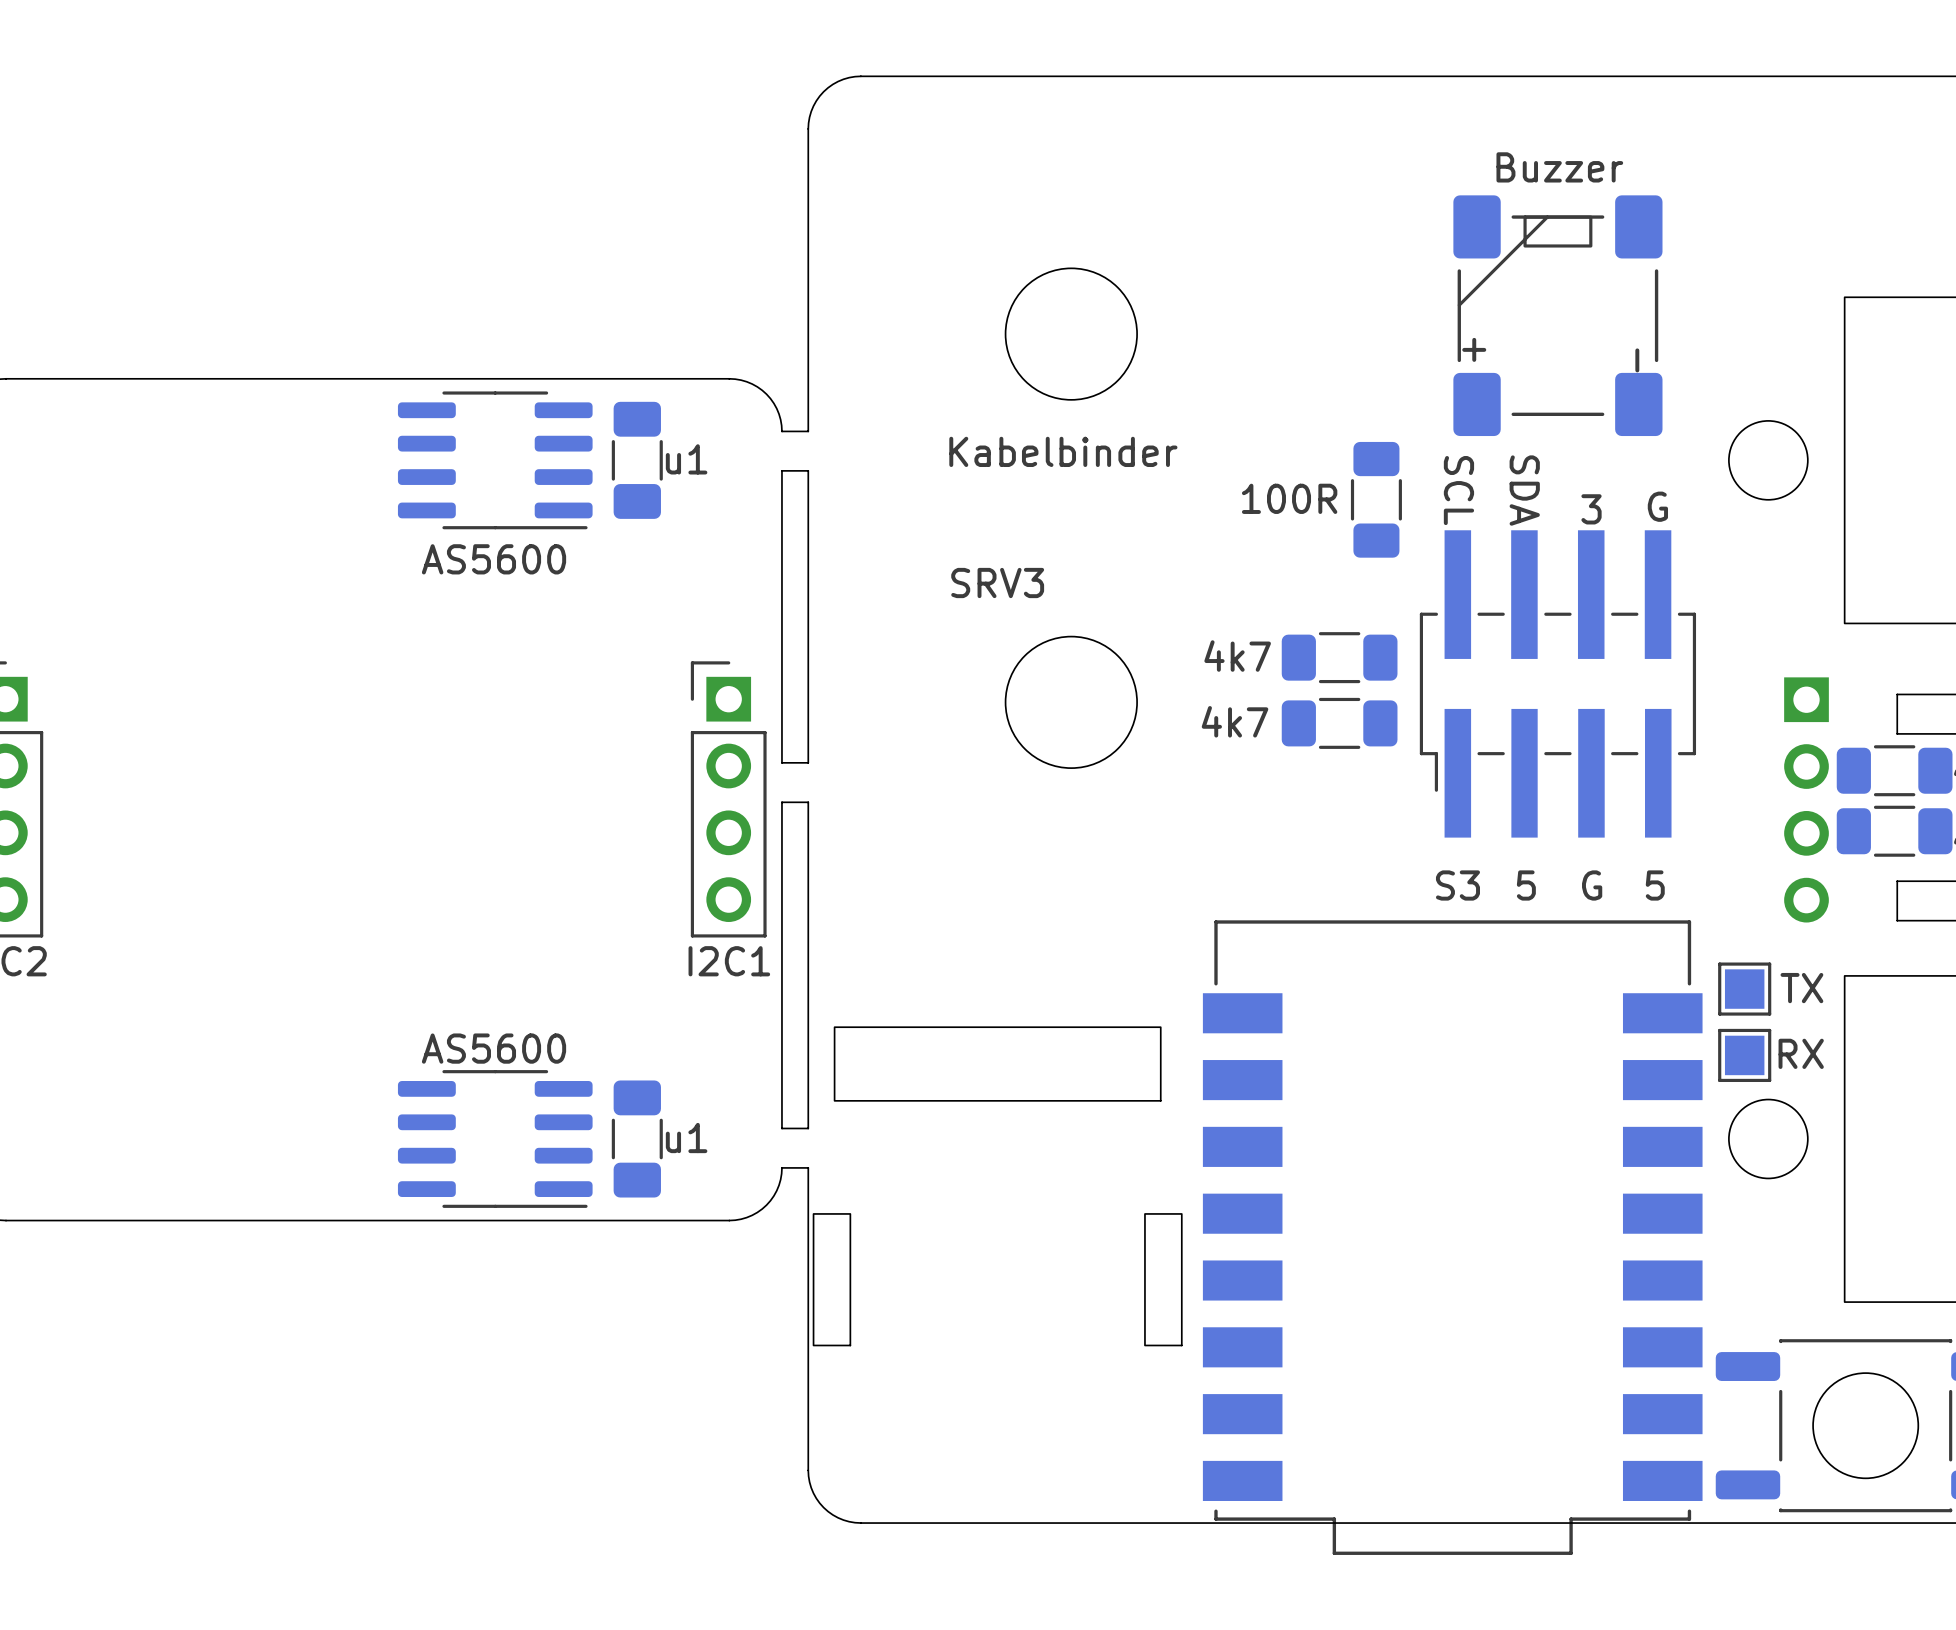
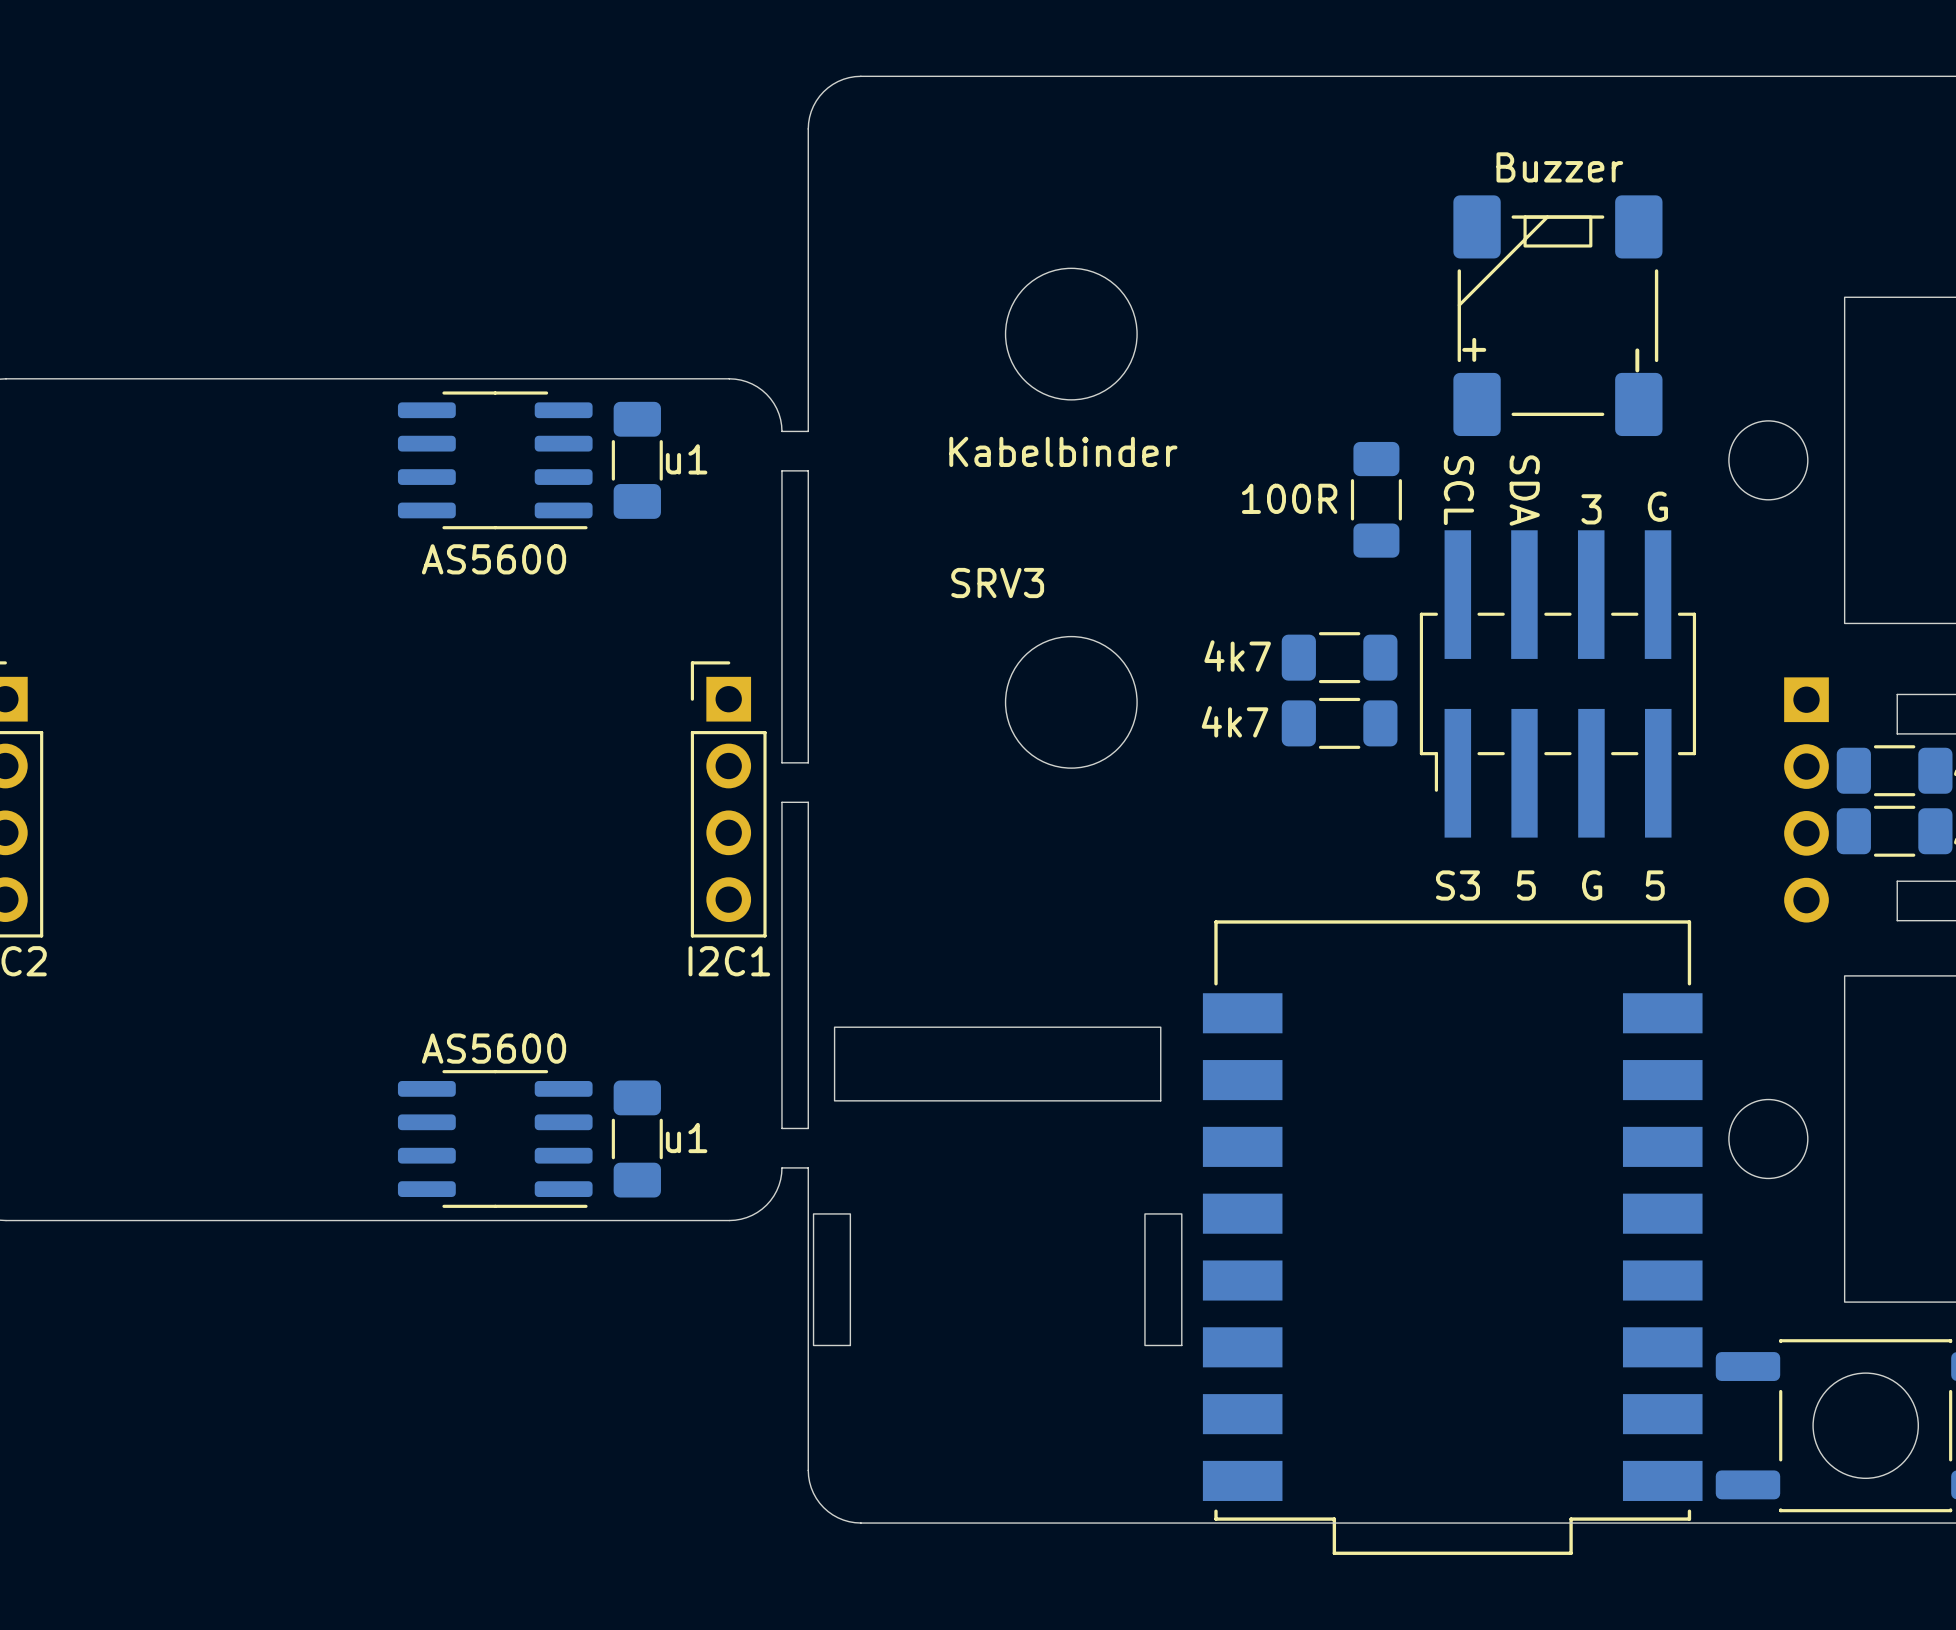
part: TX (1744, 989) -> none
part: RX (1744, 1055) -> none

